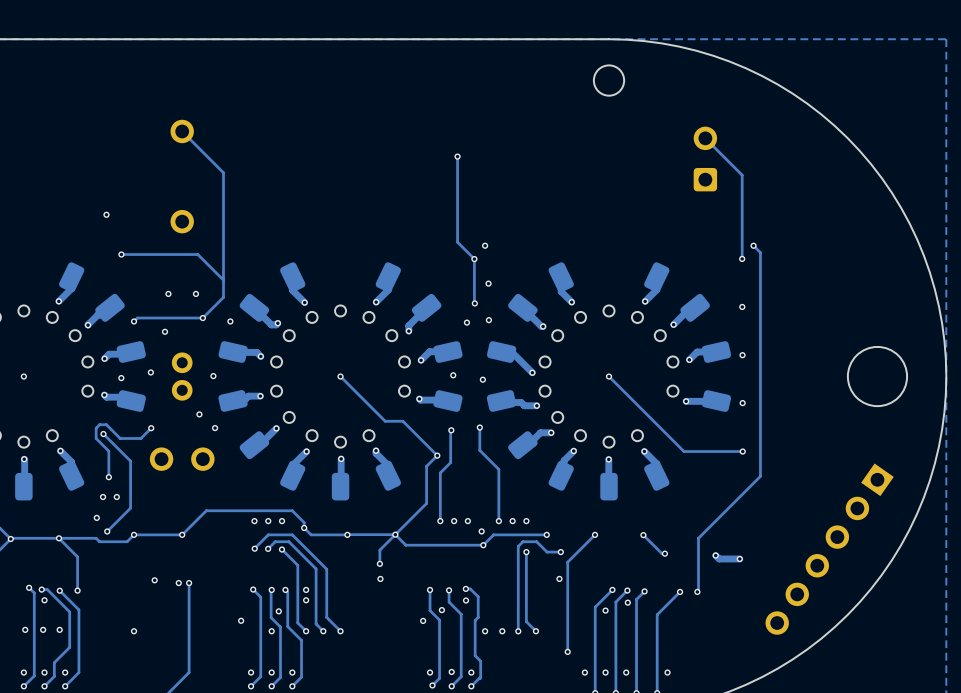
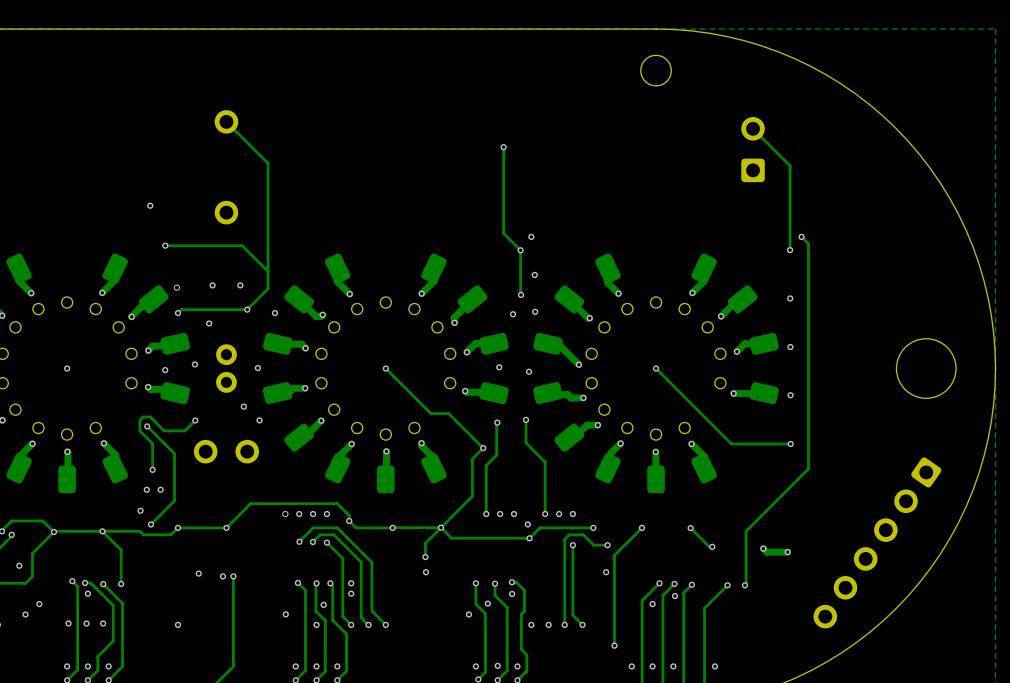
via: none -> (176, 287)
part footprint: [765, 463, 894, 635] -> [813, 457, 942, 629]
via: none -> (285, 514)

